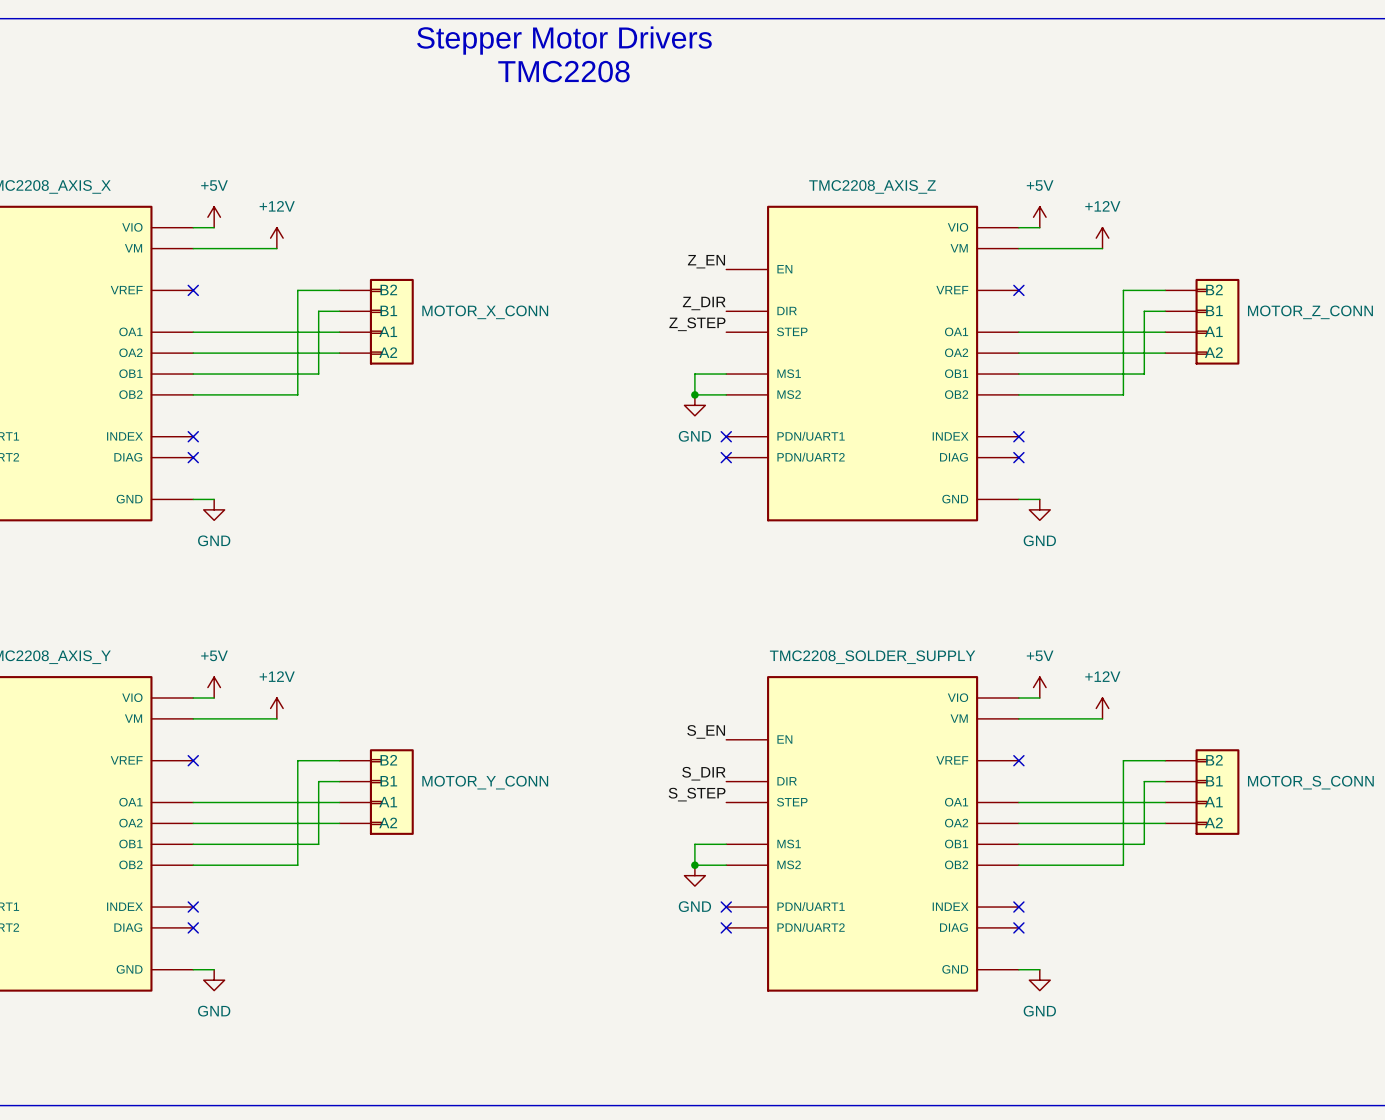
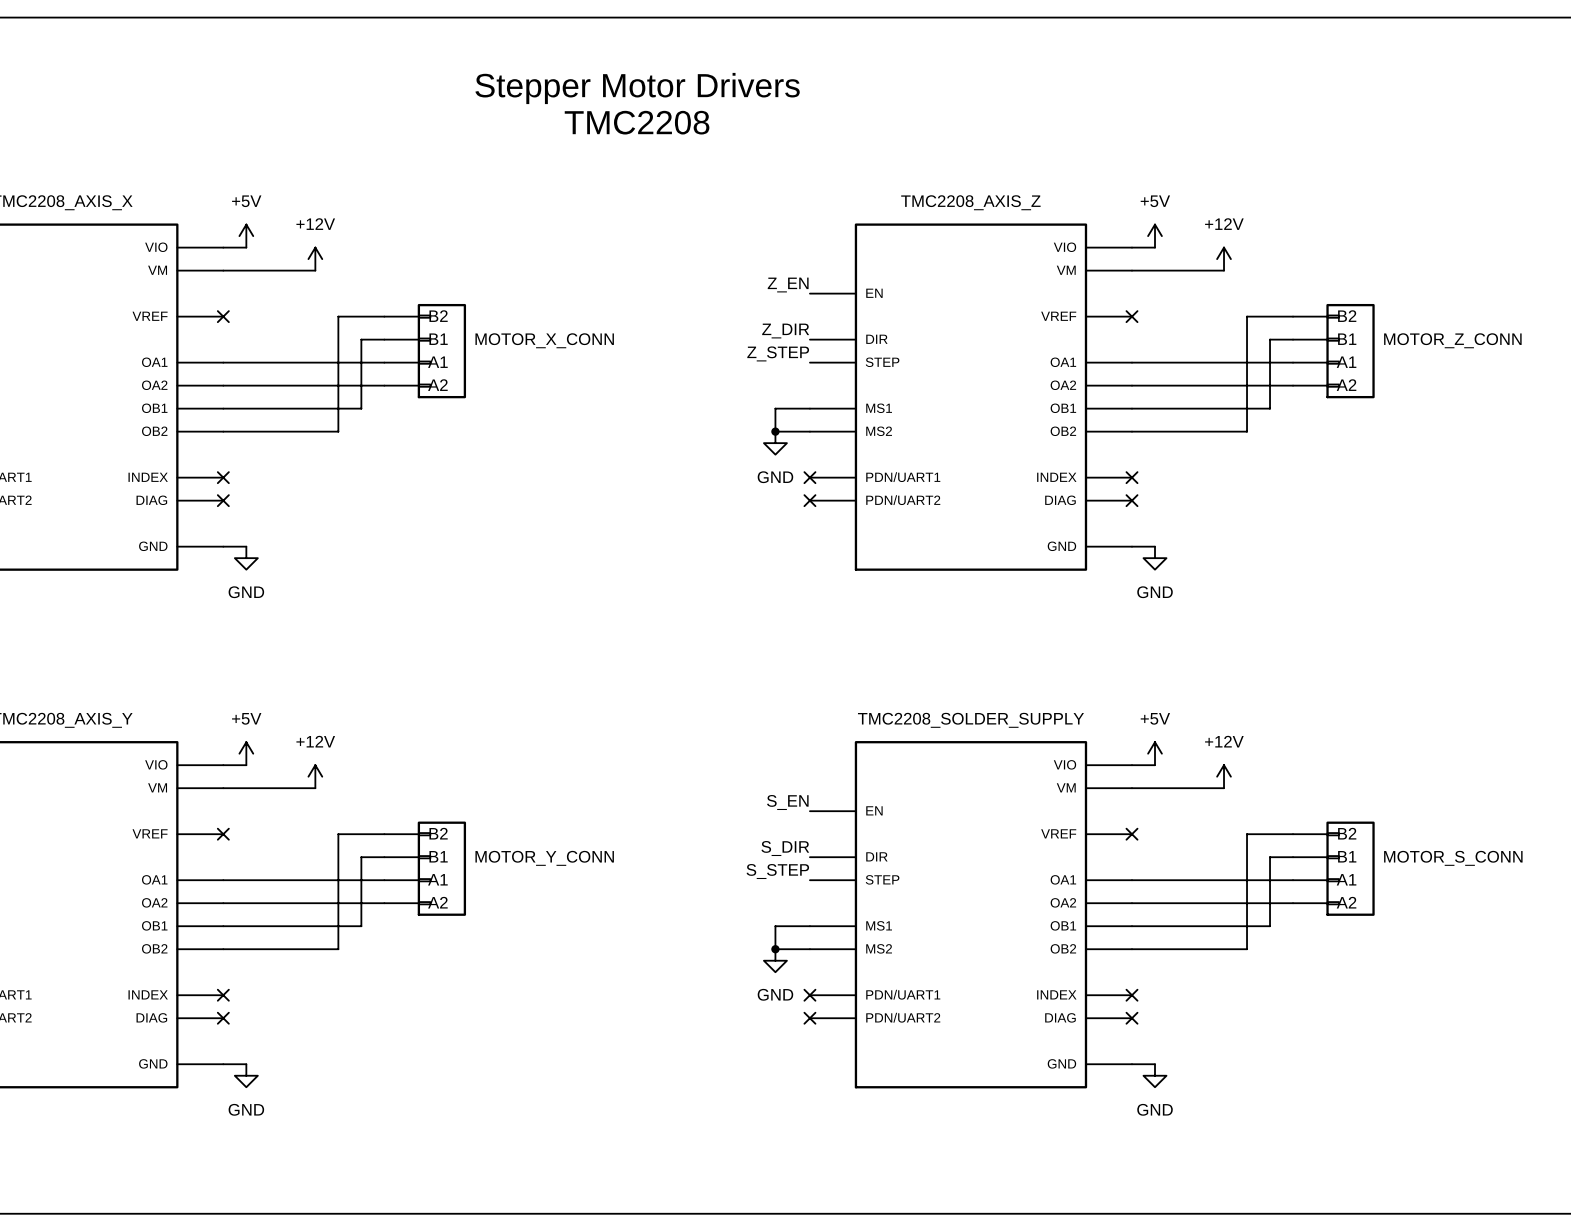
text position: Stepper Motor Drivers (564, 40) -> Stepper Motor Drivers (637, 88)
text position: TMC2208 (563, 71) -> TMC2208 (637, 122)

